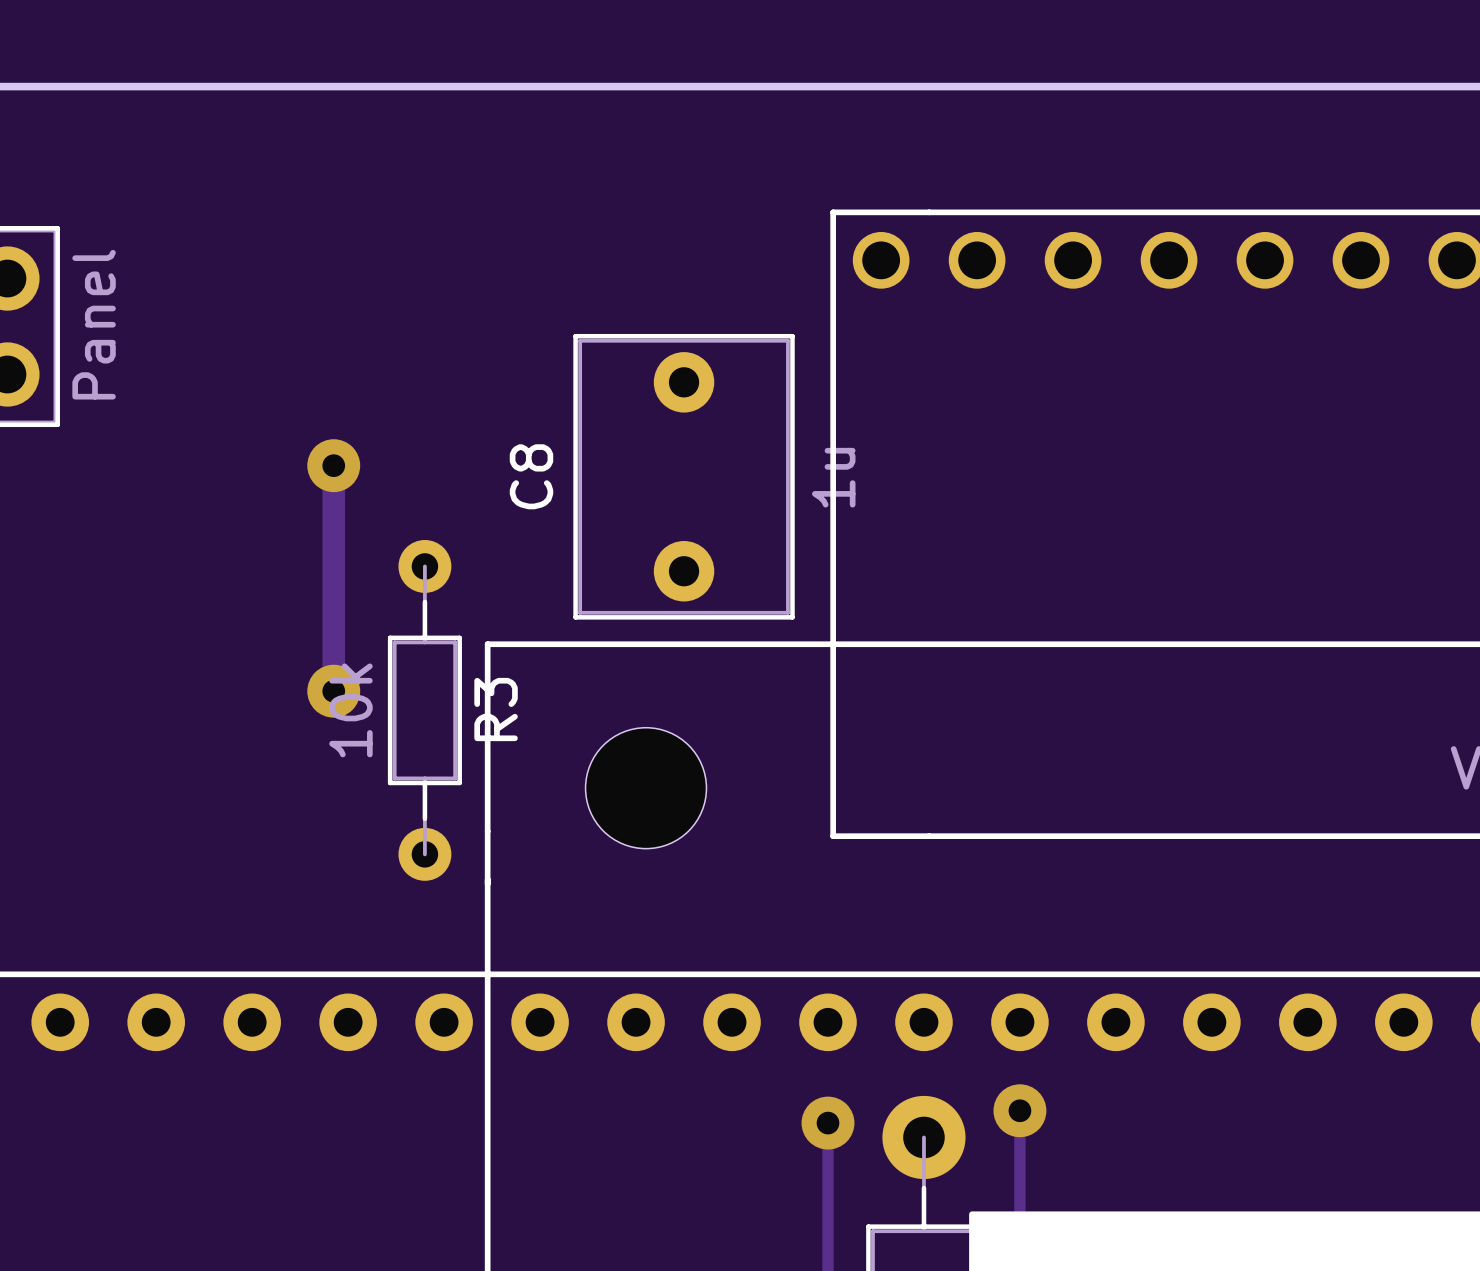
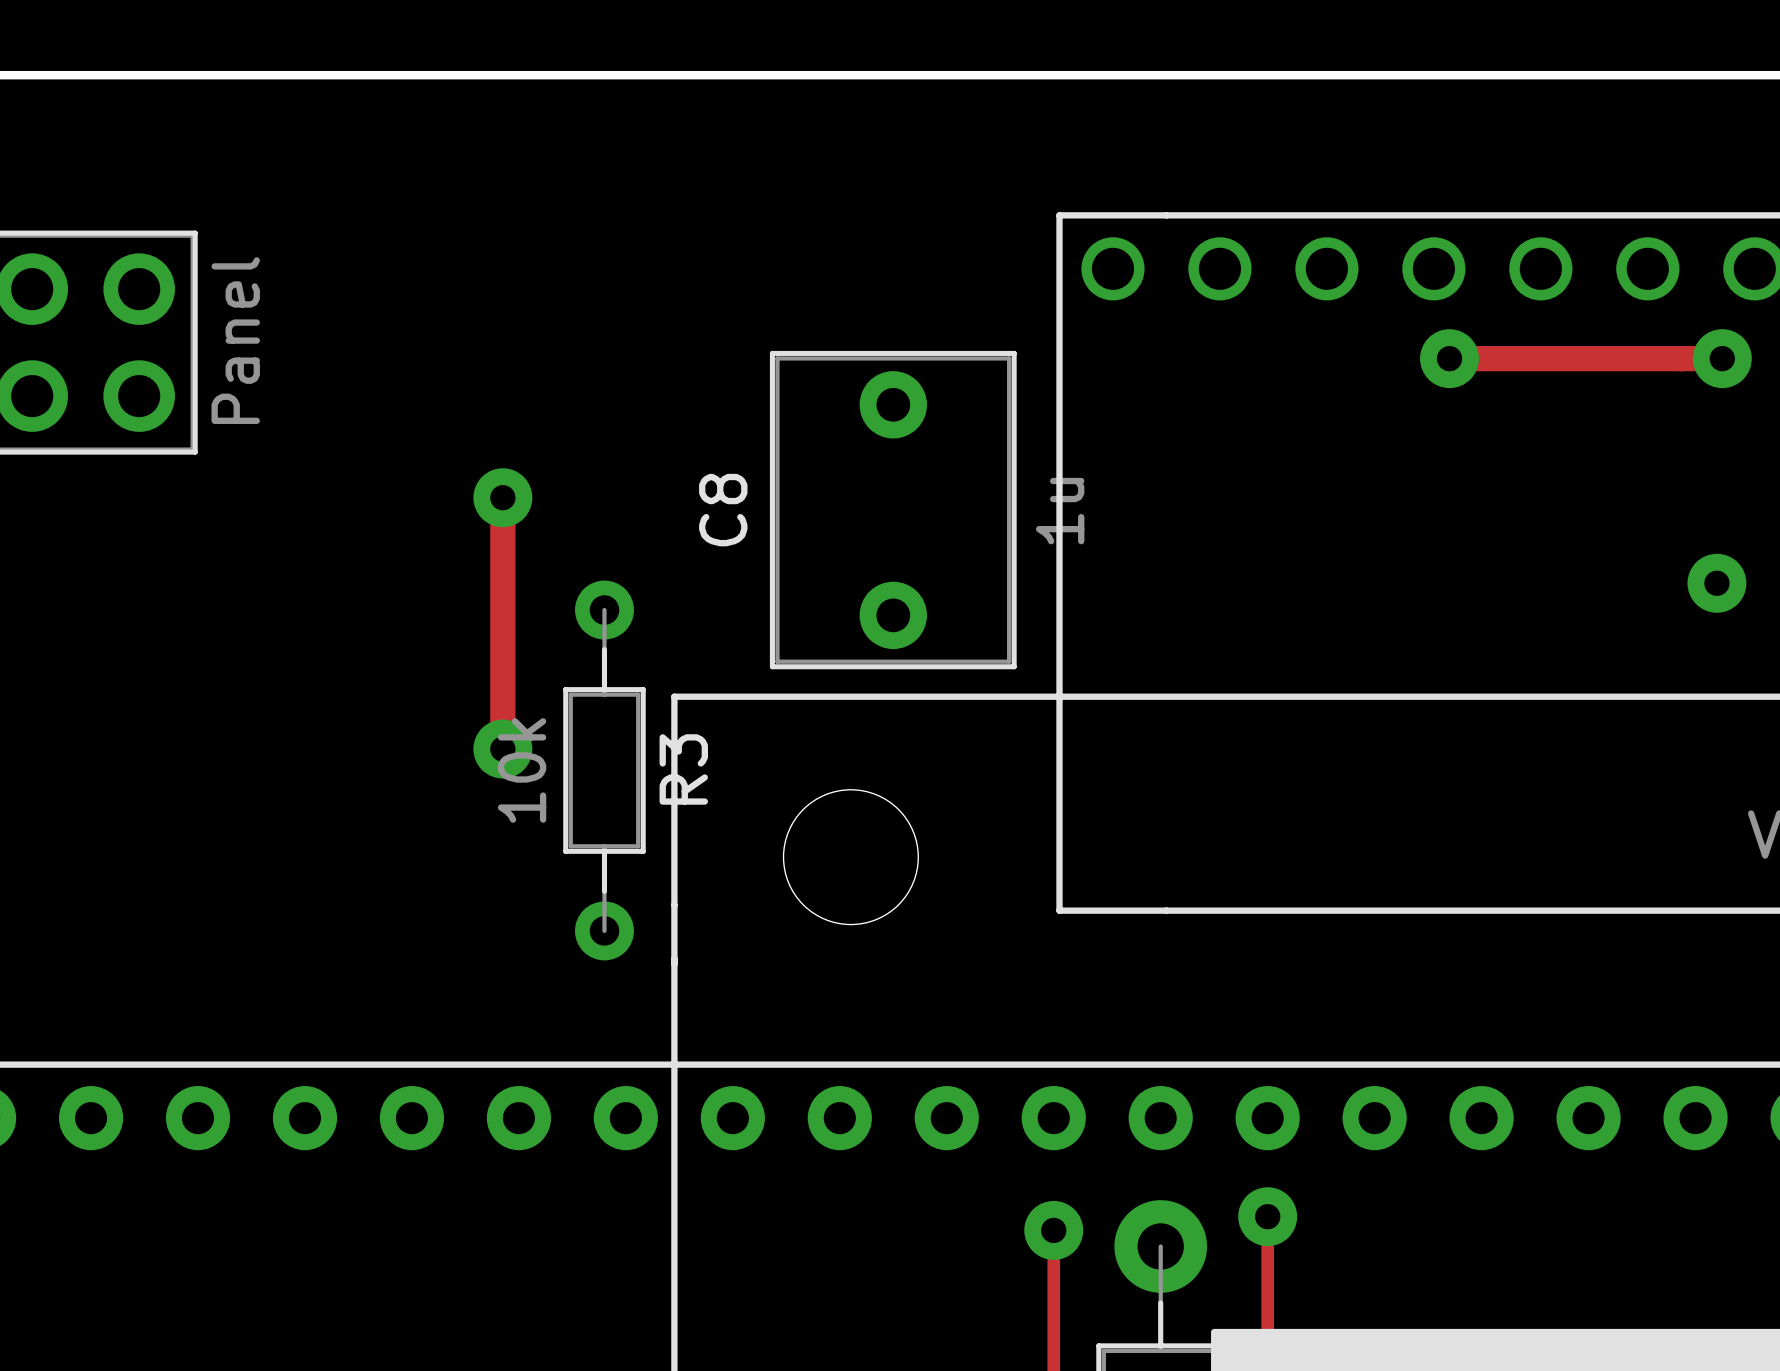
track: none -> (1449, 358) (1722, 358)
via: none -> (1449, 358)
via: none -> (1722, 358)
via: none -> (1716, 583)

